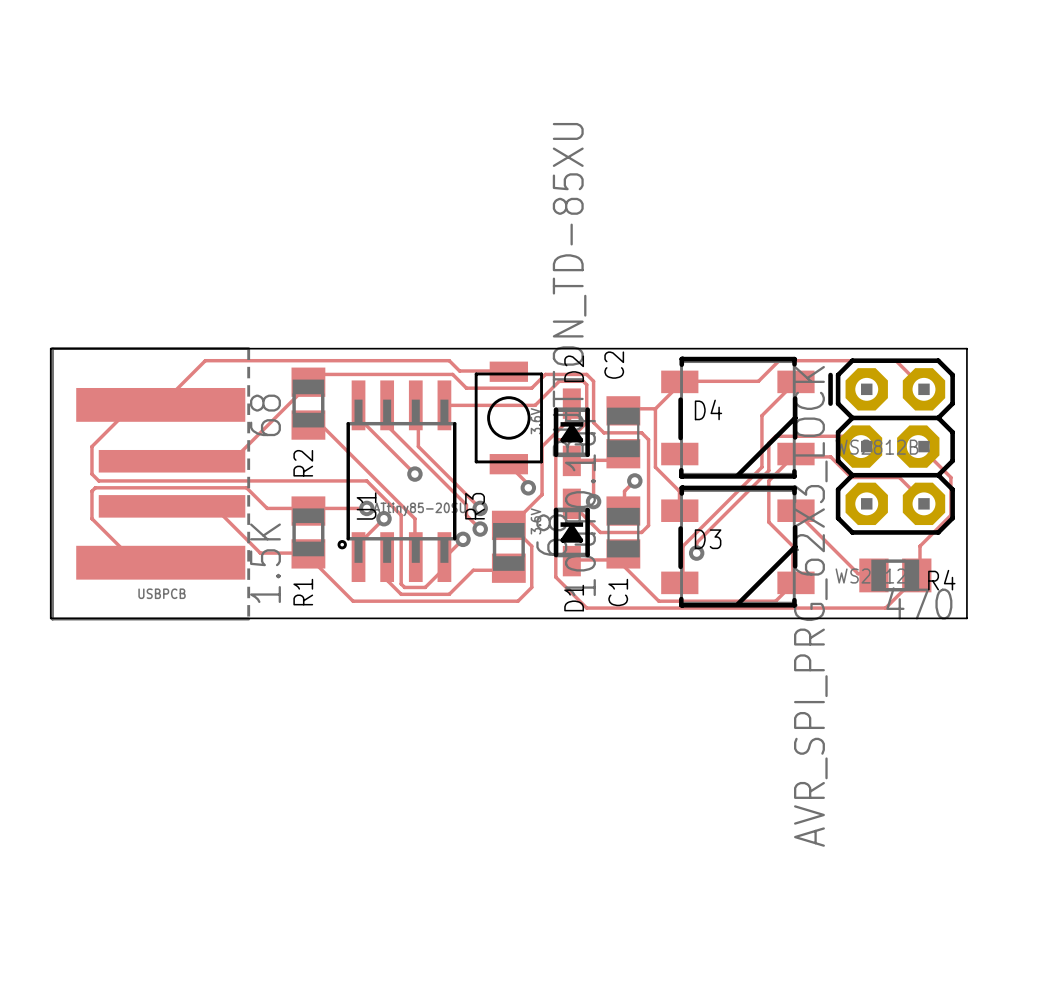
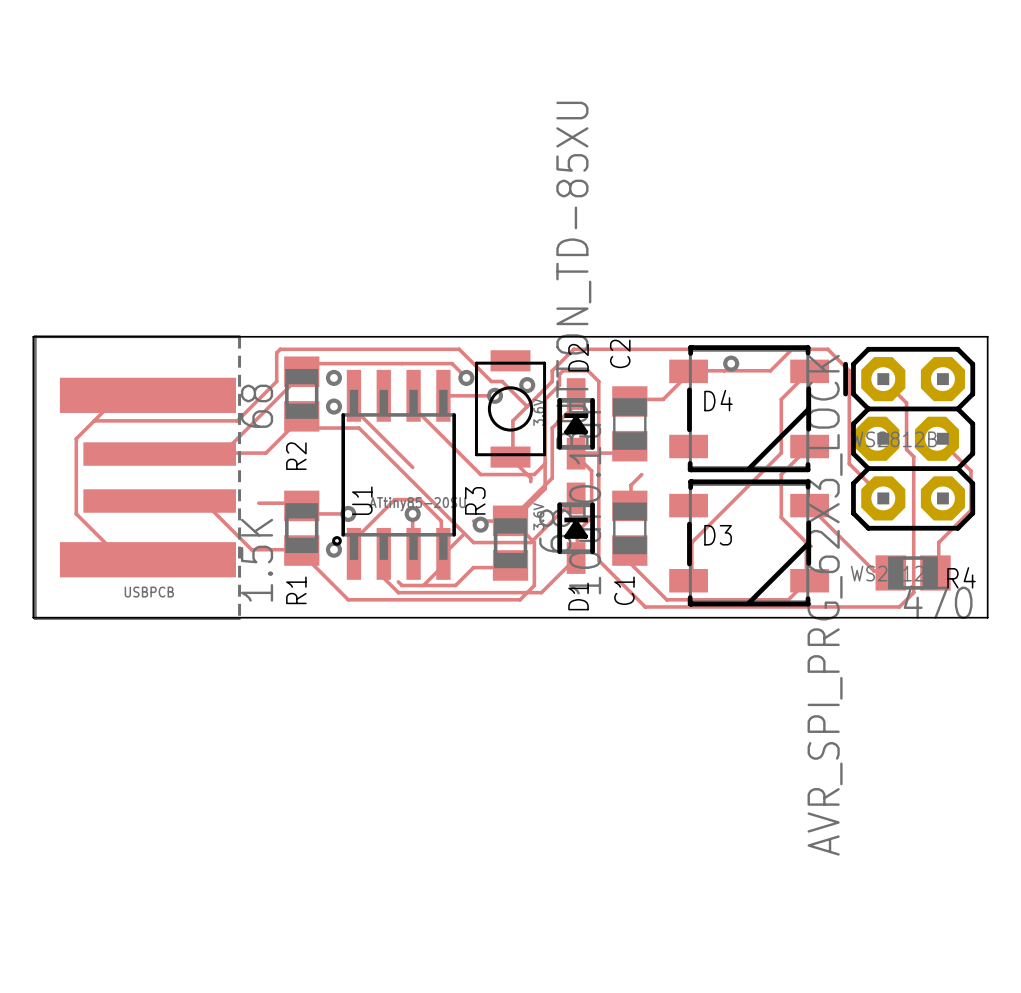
track: (287, 360) (205, 360) (160, 404) -> (280, 349) (276, 352) (276, 381) (237, 420) (94, 420)
track: (449, 360) (459, 371) (508, 371) -> (448, 349) (459, 349) (491, 381) (502, 381) (527, 406)
track: (813, 360) (895, 360) (923, 389) -> (827, 349) (849, 370) (849, 463) (883, 498)
via: none -> (731, 363)
track: (555, 384) (548, 391) -> (792, 349) (573, 349) (552, 370) (552, 381)
track: (586, 384) (586, 422) (569, 439) (559, 439) (555, 443) (555, 577) (586, 608) (638, 608) -> (598, 496) (598, 560) (645, 606)
via: none -> (333, 377)
track: (466, 388) (531, 388) (545, 374) (586, 374) (593, 381) (593, 391) -> (591, 374) (598, 381)
via: none -> (466, 377)
via: none -> (527, 385)
track: (387, 405) (387, 425) (466, 504) (466, 515) (480, 529) -> none
track: (493, 405) (535, 405) -> (510, 457) (512, 456) (512, 420) (537, 395)
via: none -> (495, 395)
track: (655, 408) (655, 467) (679, 491) (679, 510) -> none
track: (768, 408) (761, 415) (761, 467) -> (781, 399) (781, 435)
via: none -> (333, 406)
track: (569, 415) (569, 419) (542, 446) -> (559, 374) (559, 385) (545, 399) (545, 438)
track: none -> (573, 406) (552, 428) (552, 478) (510, 520) (473, 521)
track: (418, 419) (418, 446) (480, 508) -> (416, 410) (480, 474) (534, 474) (545, 463)
track: (593, 422) (603, 432) (641, 432) (648, 439) (648, 525) (641, 532) (600, 532) (571, 503) -> (598, 413) (598, 453)
track: (308, 425) (322, 425) (414, 518) -> none
track: (768, 443) (775, 436) (847, 436) (858, 446) (861, 446) -> none
track: (795, 454) (796, 456) (830, 456) (851, 477) (899, 477) (923, 503) -> none
track: none -> (223, 453) (265, 453) (301, 417) (312, 428) (359, 428) (473, 542) (530, 542) (576, 498)
track: (768, 460) (768, 470) (696, 542) (696, 553) -> (781, 453) (774, 460)
track: (91, 474) (98, 480) (366, 480) (401, 515) (401, 584) -> none
via: (414, 474) -> none
via: (634, 480) -> none
via: (528, 487) -> none
track: (91, 491) (95, 487) (246, 487) (267, 508) -> (76, 485) (76, 467)
via: (593, 501) -> none
track: (308, 508) (366, 508) -> none
via position: (366, 508) -> (348, 513)
via: (480, 508) -> none
track: none -> (301, 505) (308, 513) (348, 513)
track: none -> (380, 513) (394, 499) (419, 499) (441, 521) (441, 553) (443, 553)
via: (384, 518) -> none
via: none -> (412, 513)
via: (463, 539) -> none
via: none -> (333, 549)
via: (696, 553) -> none
track: (572, 559) (617, 559) -> (577, 556) (577, 531) (591, 517) (591, 470) (576, 453)
track: none -> (576, 558) (541, 592) (448, 592)
track: (916, 575) (885, 608) (882, 608) -> (883, 379) (906, 402) (906, 449) (913, 456) (913, 592) (899, 606)
track: (456, 587) (449, 594) -> (455, 585) (423, 585)

